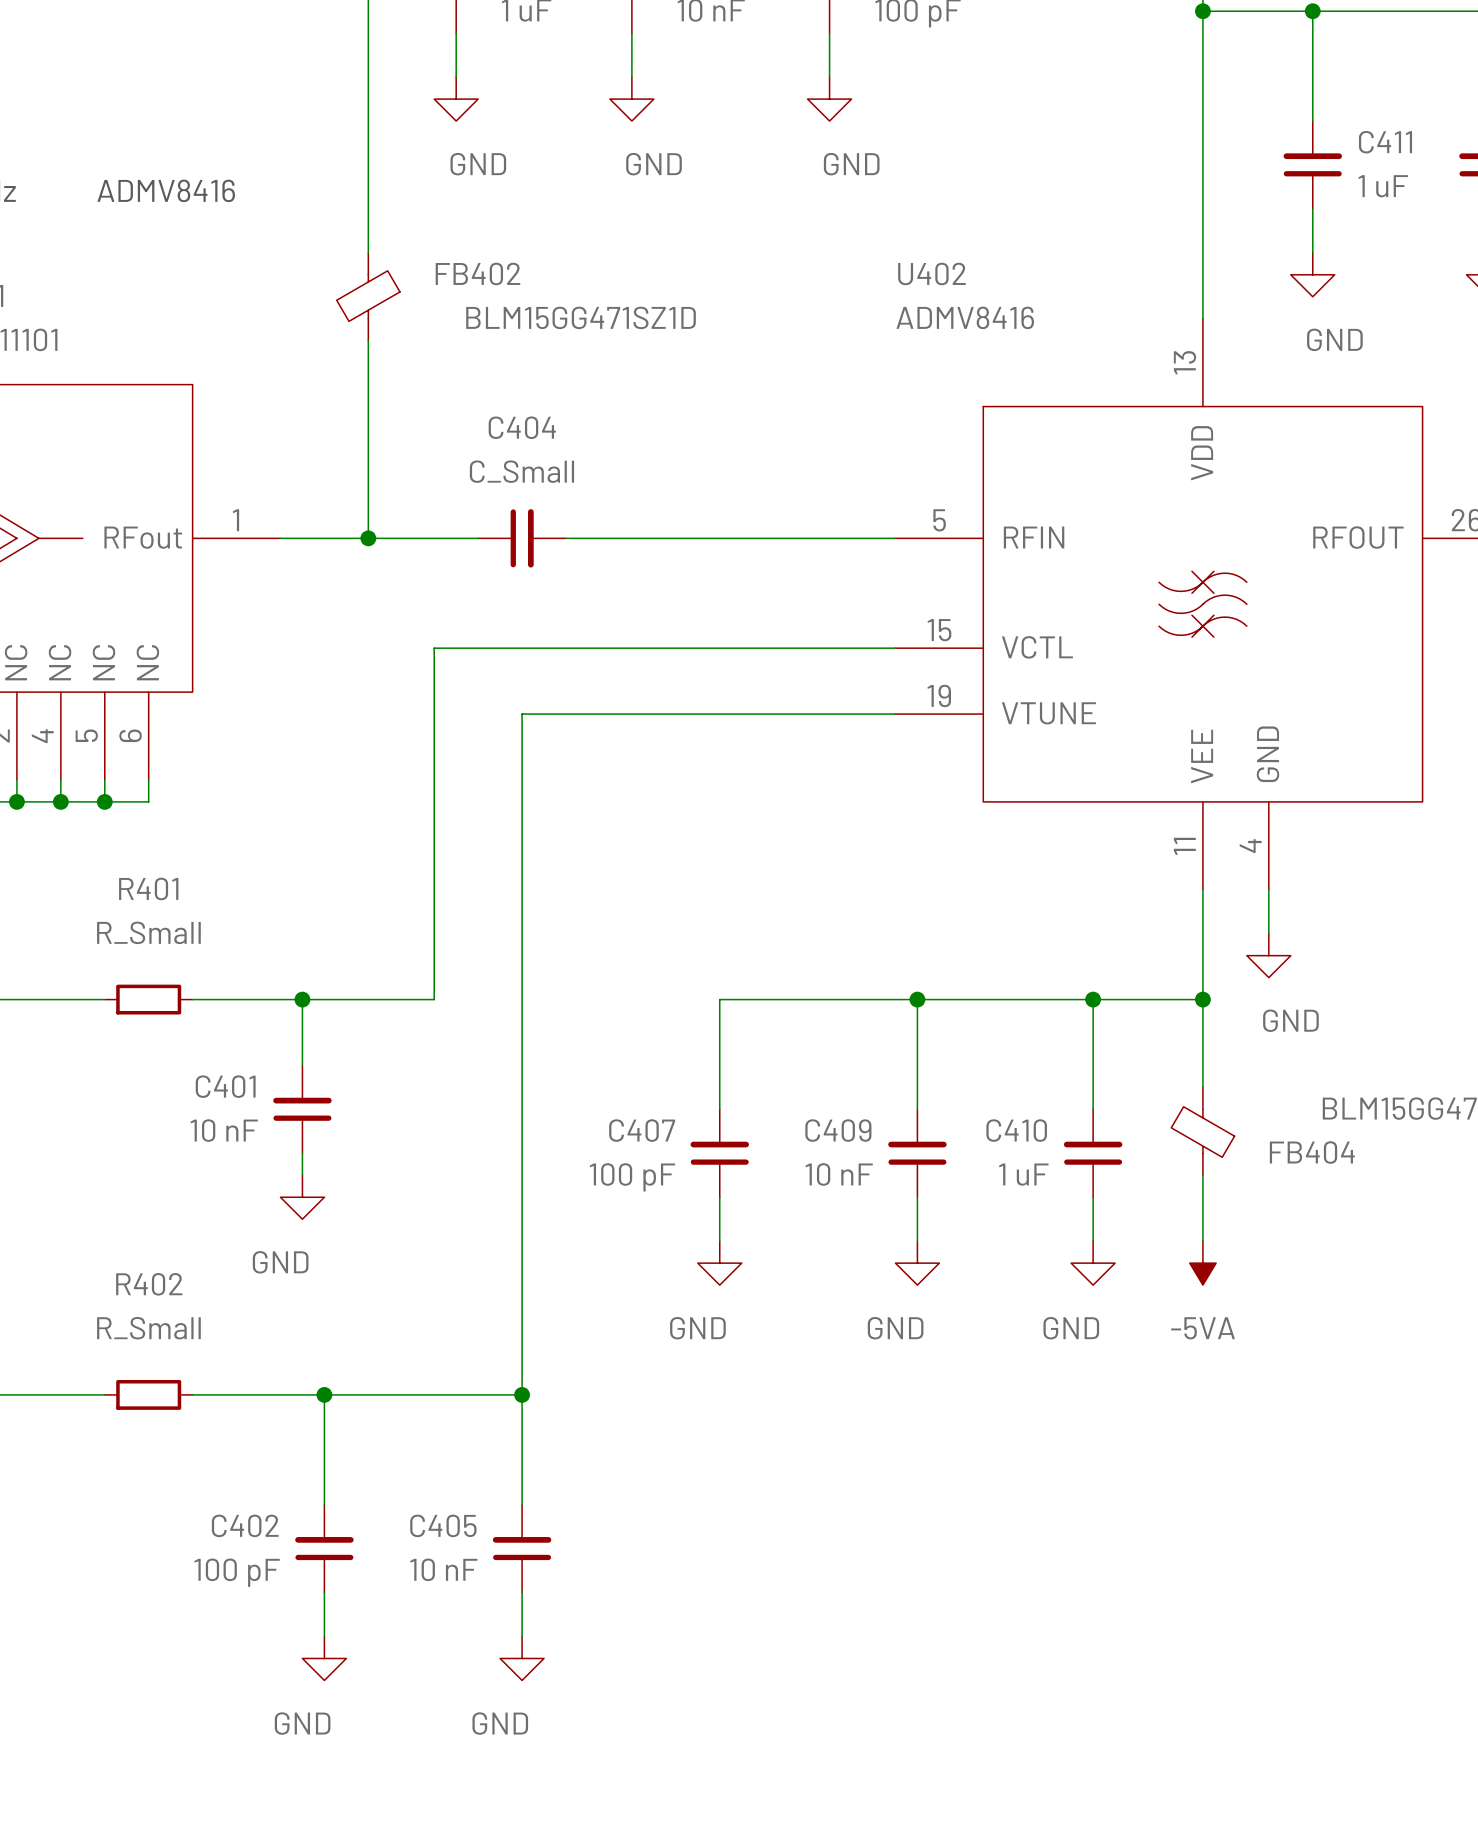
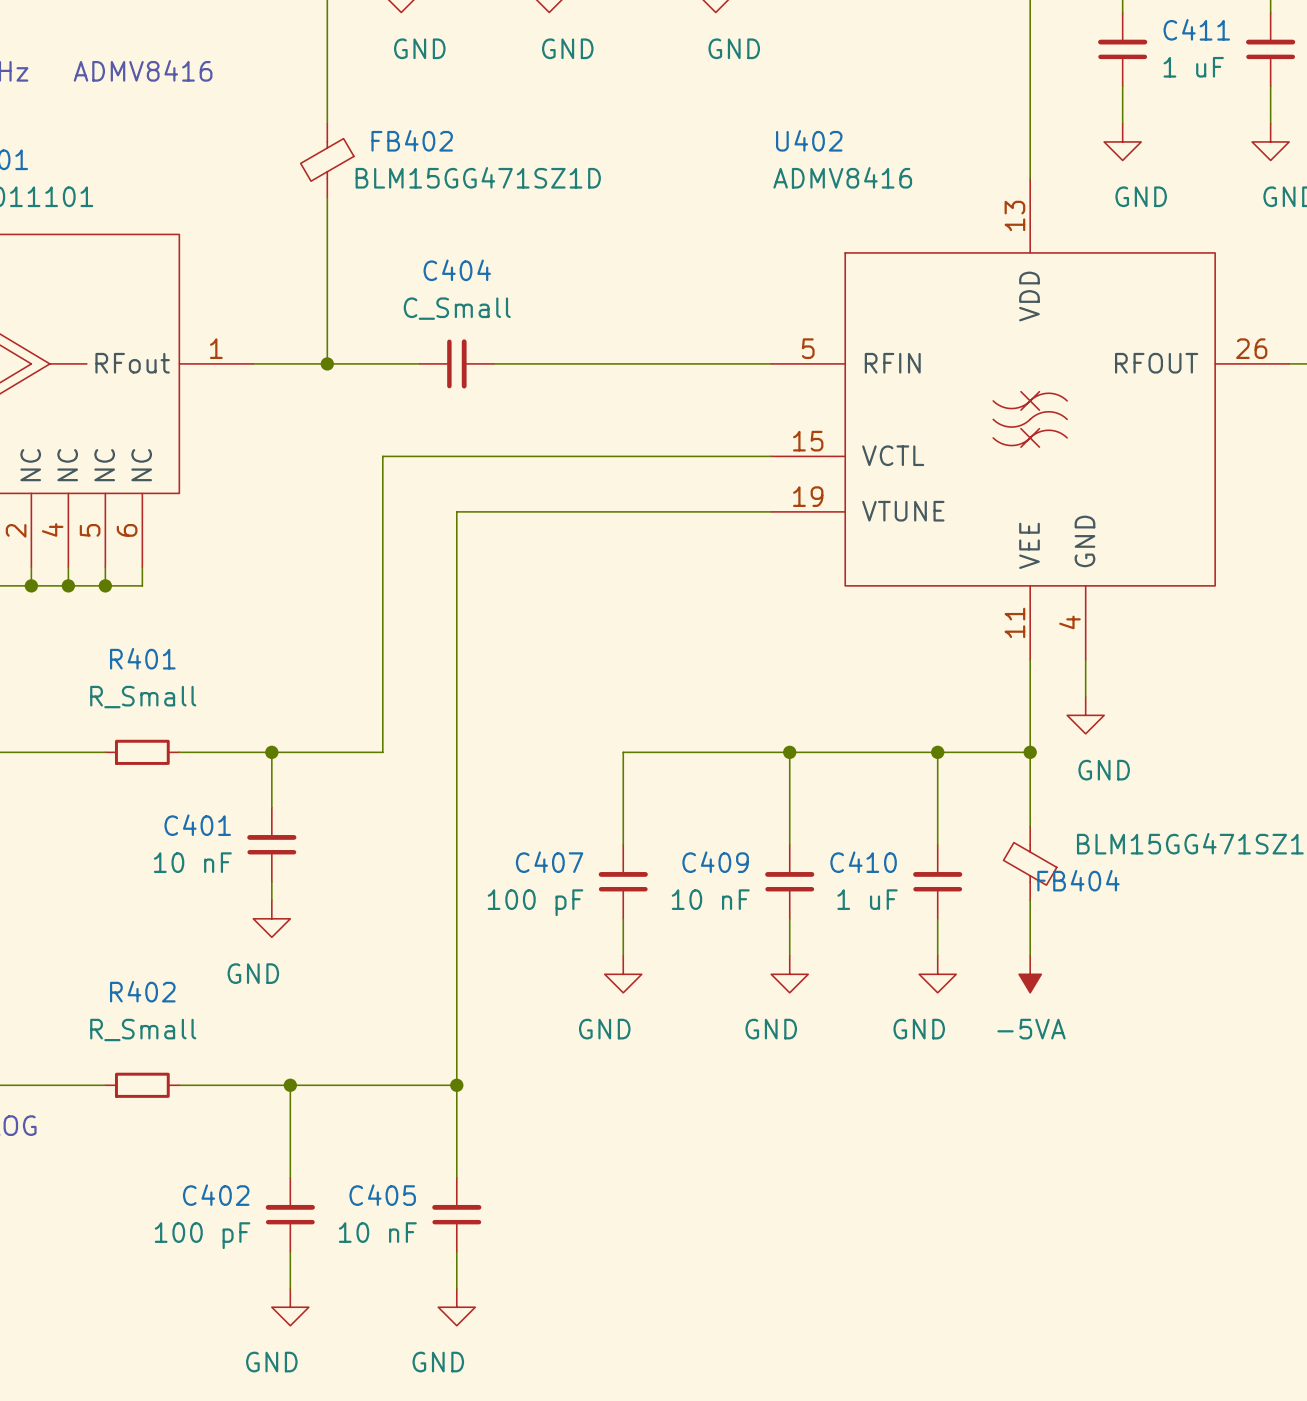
FB404 name position: FB404 (1312, 1152) -> FB404 (1078, 880)

